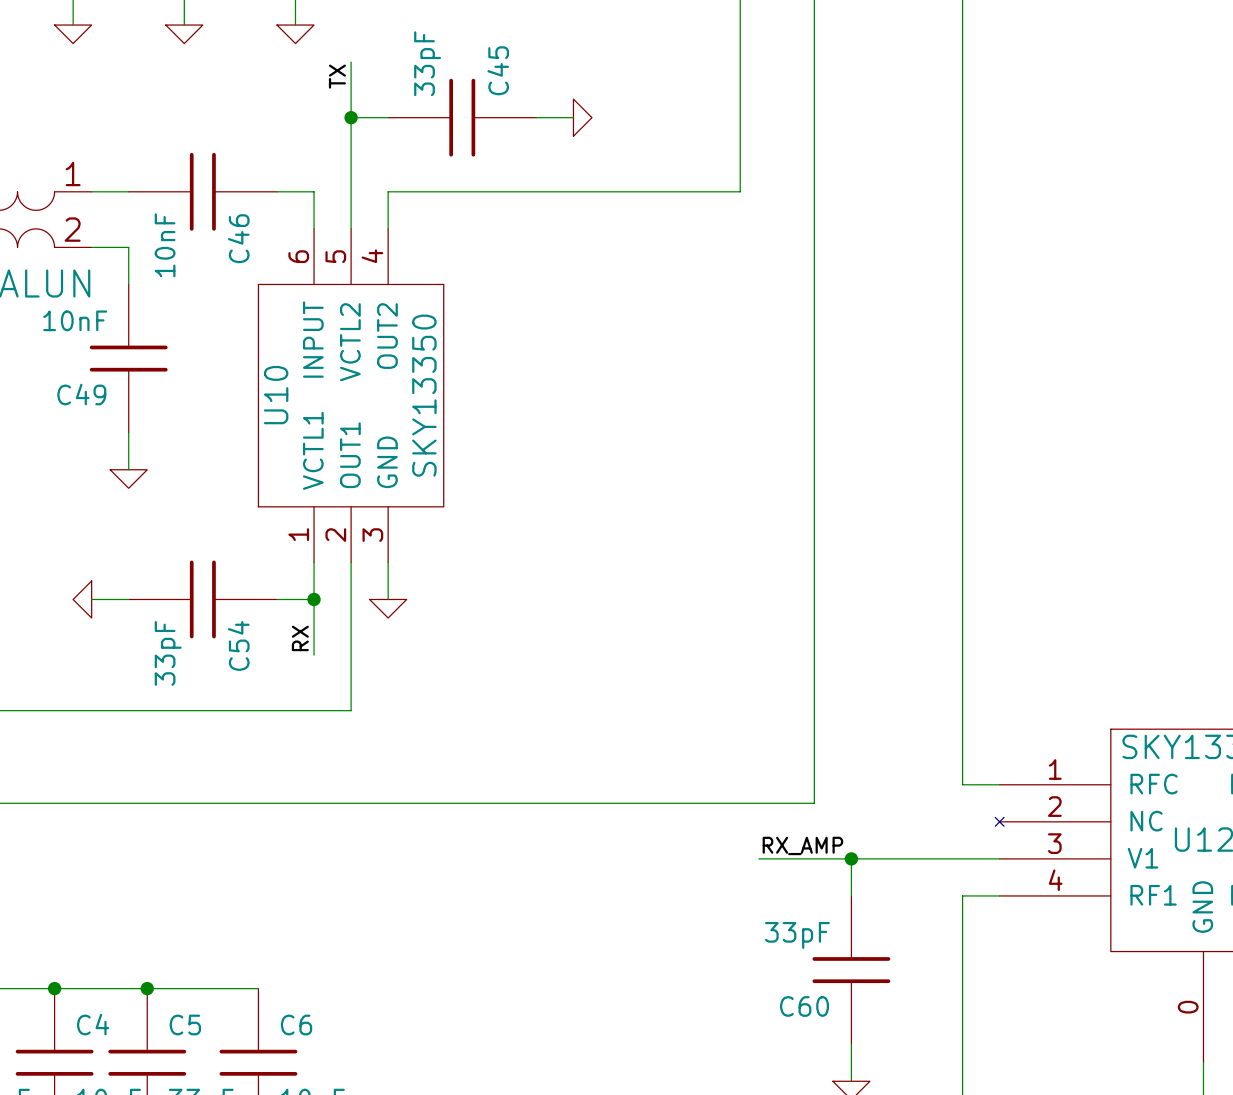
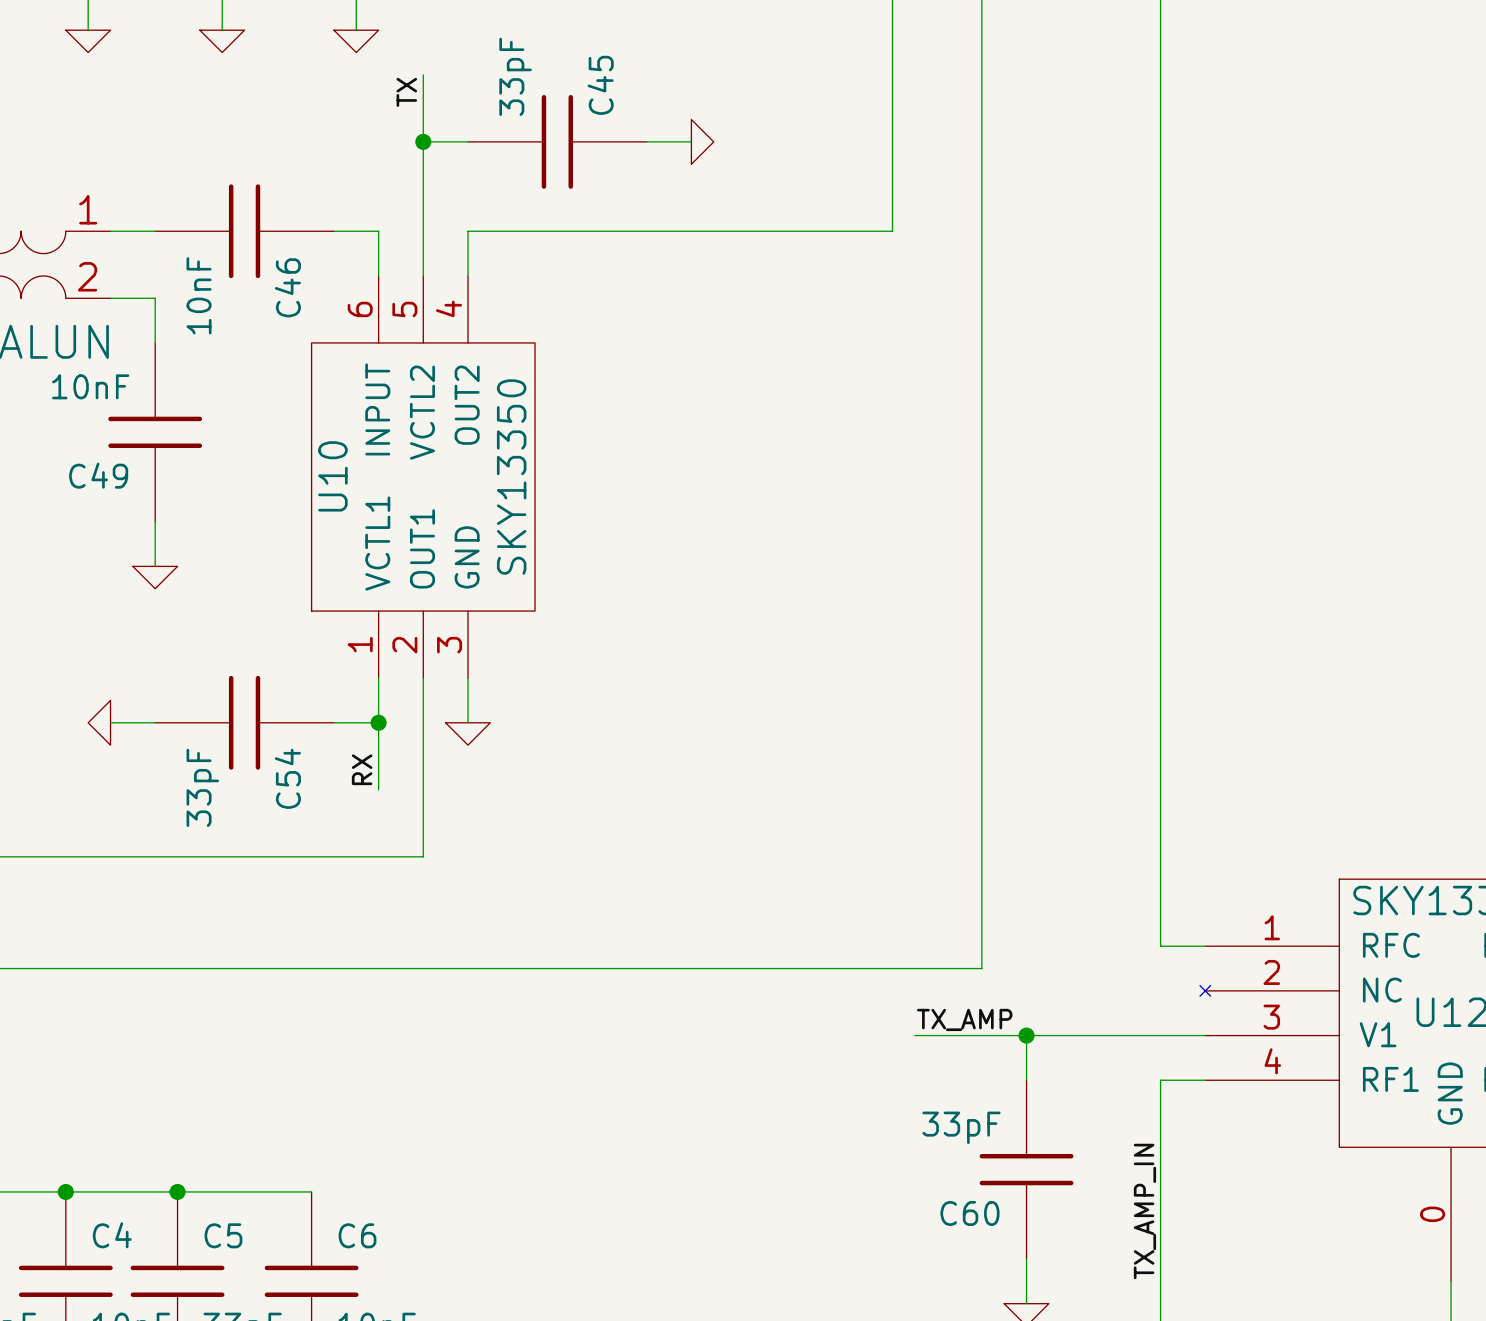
label: RX_AMP (802, 845) -> TX_AMP (964, 1019)
label: none -> TX_AMP_IN (1144, 1211)

